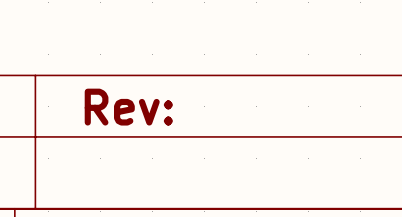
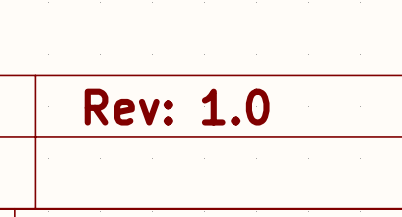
title block: Rev: (128, 107) -> Rev: 1.0 (177, 107)

